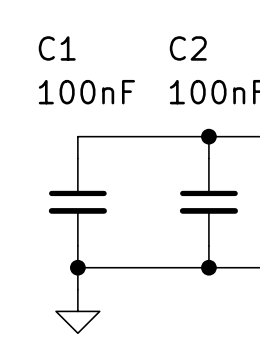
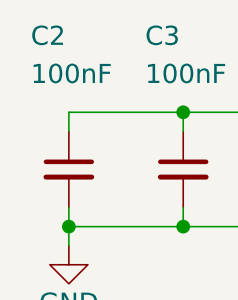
C1 name: C1 (57, 48) -> C2 (47, 35)
C2 name: C2 (188, 48) -> C3 (162, 35)

